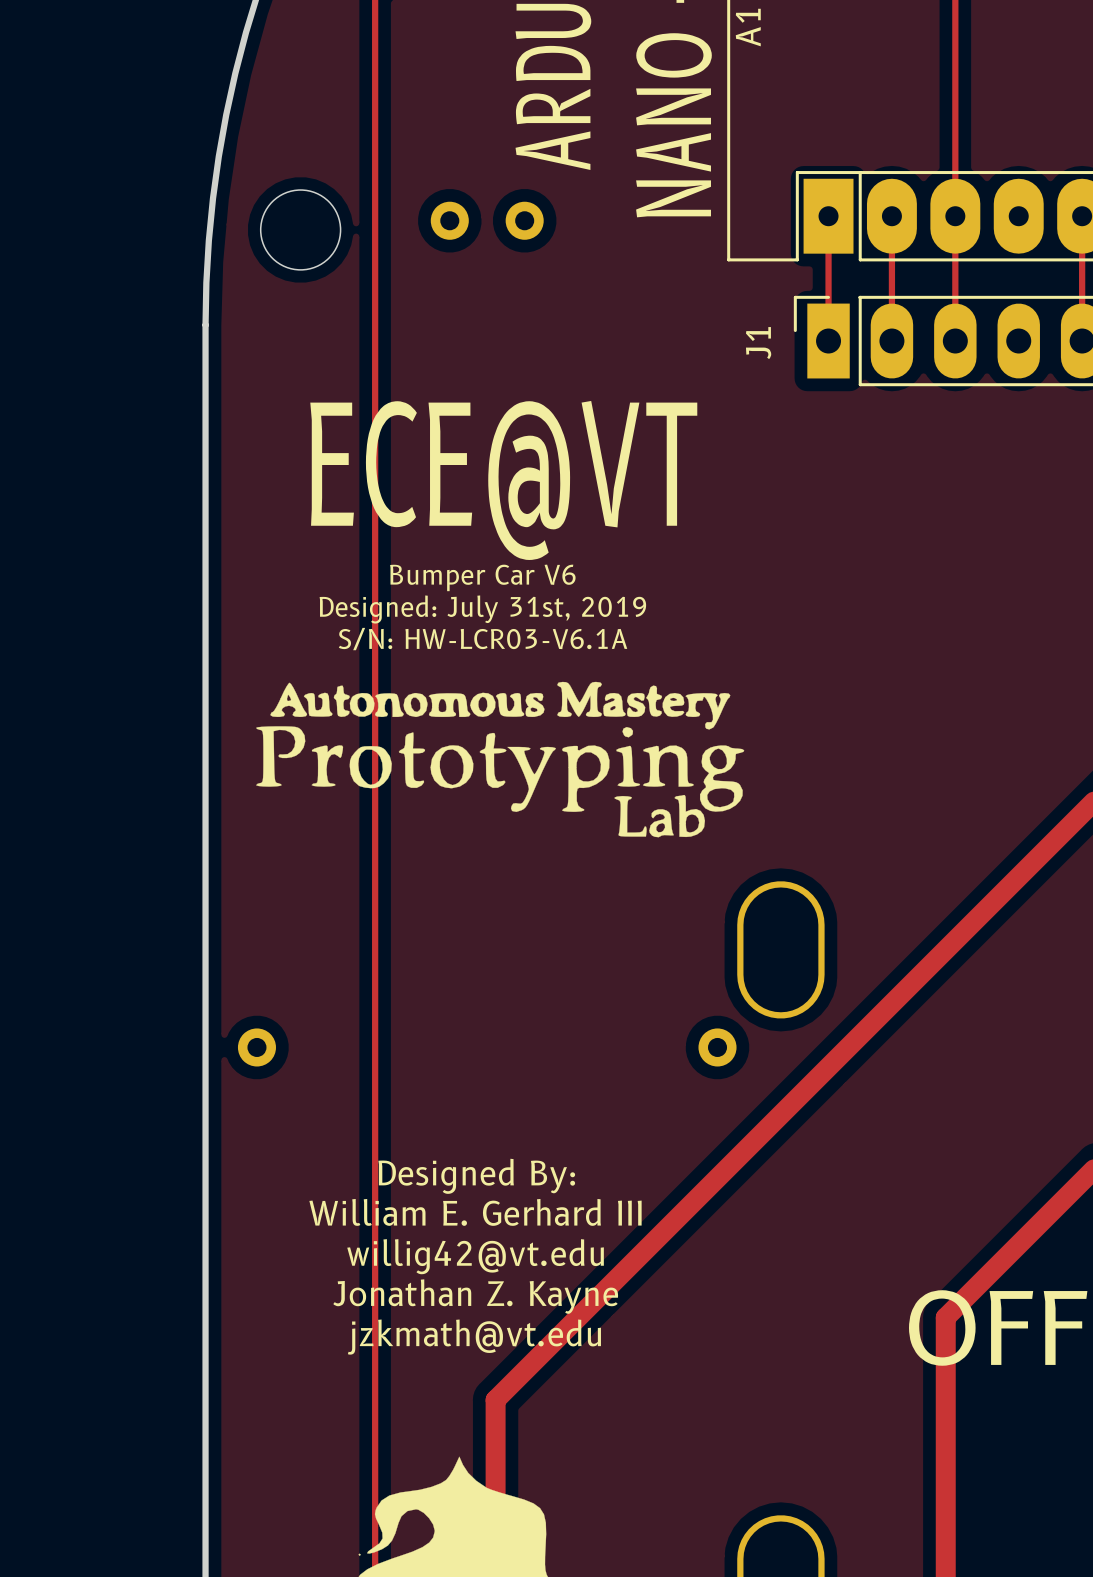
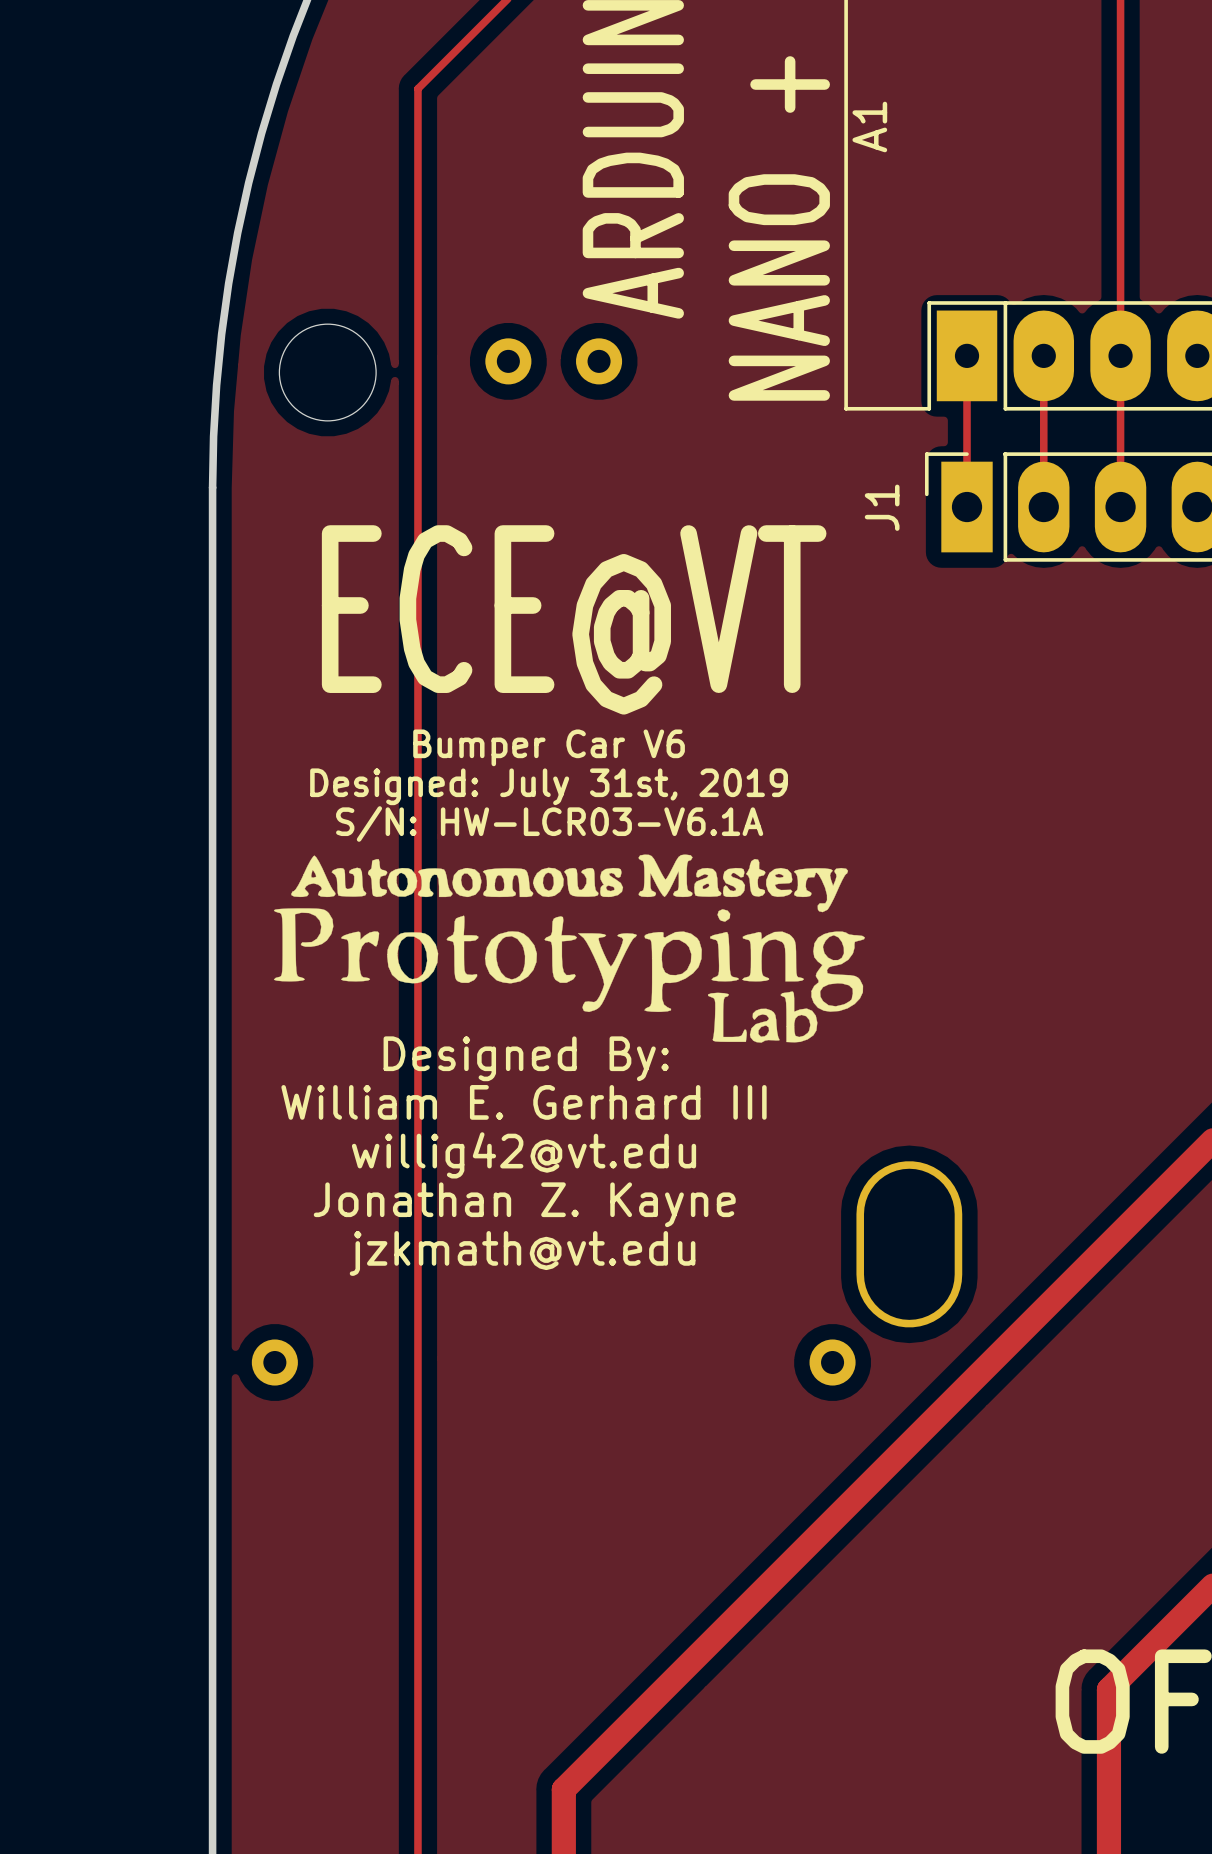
text position: ECE@VT (503, 480) -> ECE@VT (574, 619)
text position: Bumper Car V6 (482, 577) -> Bumper Car V6 (549, 747)
text position: Designed: July 31st, 2019 (482, 609) -> Designed: July 31st, 2019 (549, 786)
text position: S/N: HW-LCR03-V6.1A (483, 639) -> S/N: HW-LCR03-V6.1A (549, 823)
drawing position: (500, 759) -> (569, 948)
text position: Designed By: (476, 1176) -> Designed By: (526, 1058)
text position: William E. Gerhard III (475, 1212) -> William E. Gerhard III (524, 1102)
text position: willig42@vt.edu (475, 1256) -> willig42@vt.edu (524, 1155)
text position: Jonathan Z. Kayne (475, 1296) -> Jonathan Z. Kayne (524, 1204)
text position: jzkmath@vt.edu (474, 1337) -> jzkmath@vt.edu (522, 1253)

